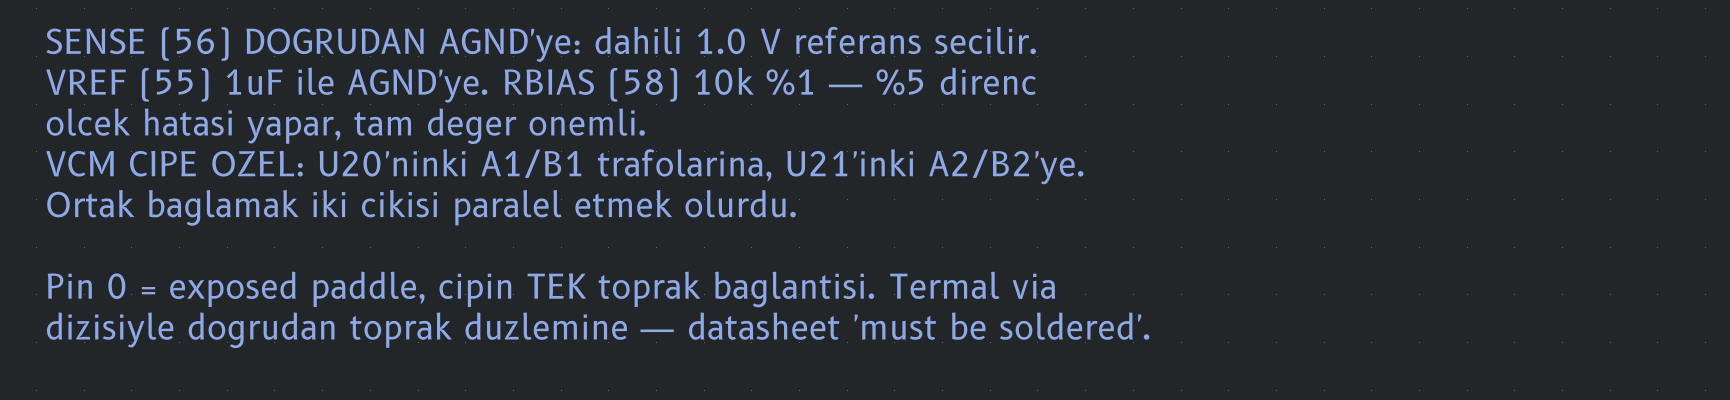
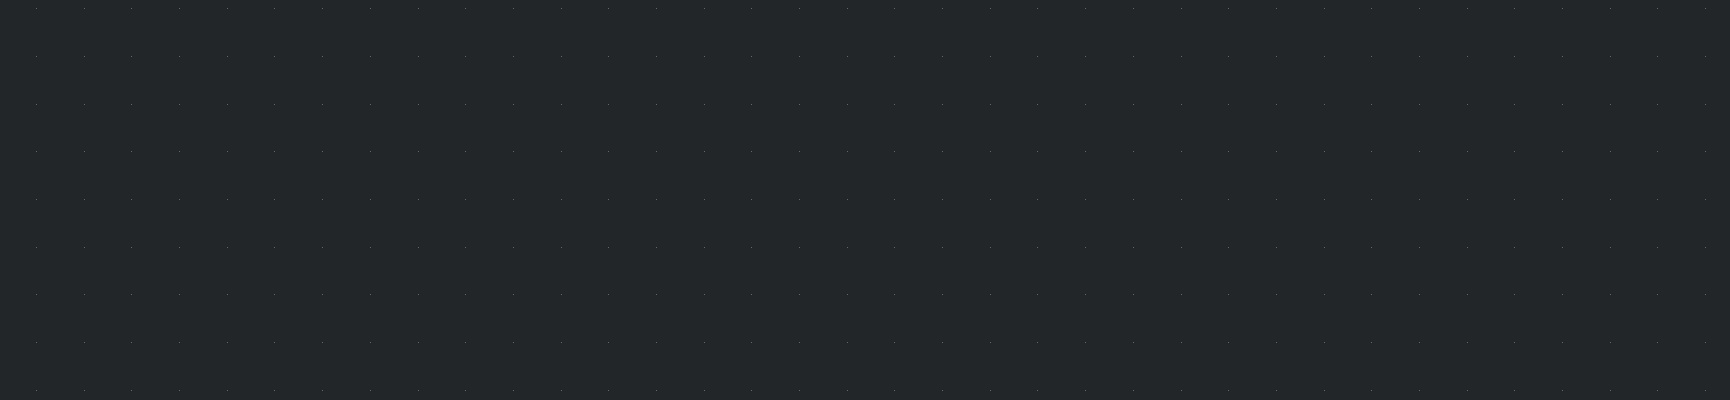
text: SENSE (56) DOGRUDAN AGND'ye: dahili 1.0 V referans secilir. (541, 44) -> none
text: VREF (55) 1uF ile AGND'ye. RBIAS (58) 10k %1 — %5 direnc (541, 85) -> none
text: olcek hatasi yapar, tam deger onemli. (345, 126) -> none
text: VCM CIPE OZEL: U20'ninki A1/B1 trafolarina, U21'inki A2/B2'ye. (564, 166) -> none
text: Ortak baglamak iki cikisi paralel etmek olurdu. (421, 207) -> none
text: Pin 0 = exposed paddle, cipin TEK toprak baglantisi. Termal via (551, 289) -> none
text: dizisiyle dogrudan toprak duzlemine — datasheet 'must be soldered'. (598, 330) -> none

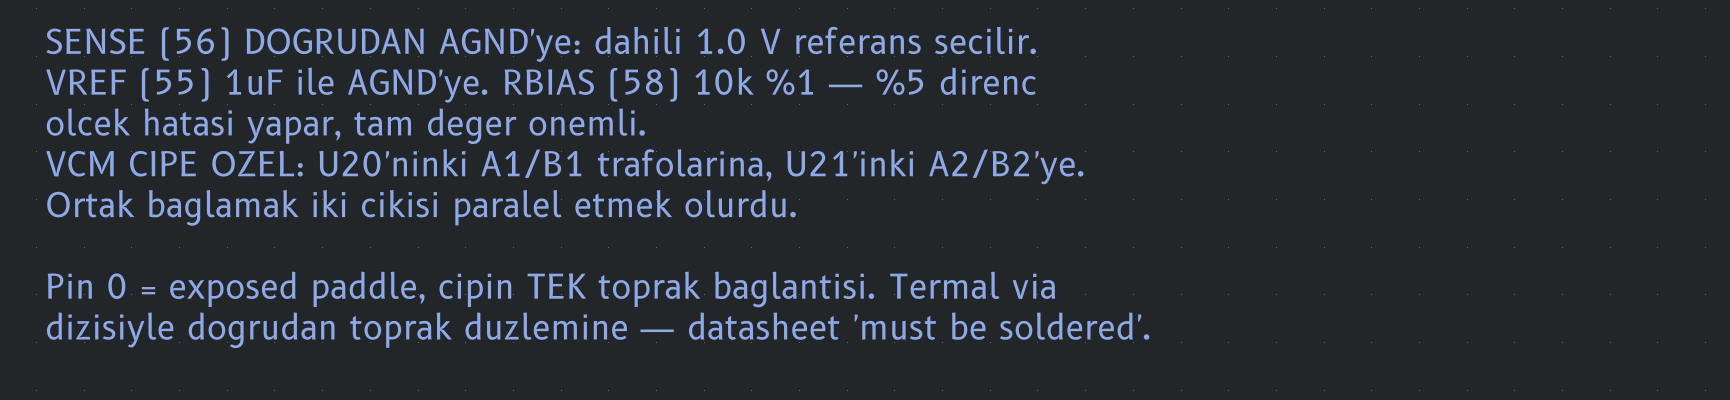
text: none -> SENSE (56) DOGRUDAN AGND'ye: dahili 1.0 V referans secilir. (541, 44)
text: none -> VREF (55) 1uF ile AGND'ye. RBIAS (58) 10k %1 — %5 direnc (541, 85)
text: none -> olcek hatasi yapar, tam deger onemli. (345, 126)
text: none -> VCM CIPE OZEL: U20'ninki A1/B1 trafolarina, U21'inki A2/B2'ye. (564, 166)
text: none -> Ortak baglamak iki cikisi paralel etmek olurdu. (421, 207)
text: none -> Pin 0 = exposed paddle, cipin TEK toprak baglantisi. Termal via (551, 289)
text: none -> dizisiyle dogrudan toprak duzlemine — datasheet 'must be soldered'. (598, 330)

